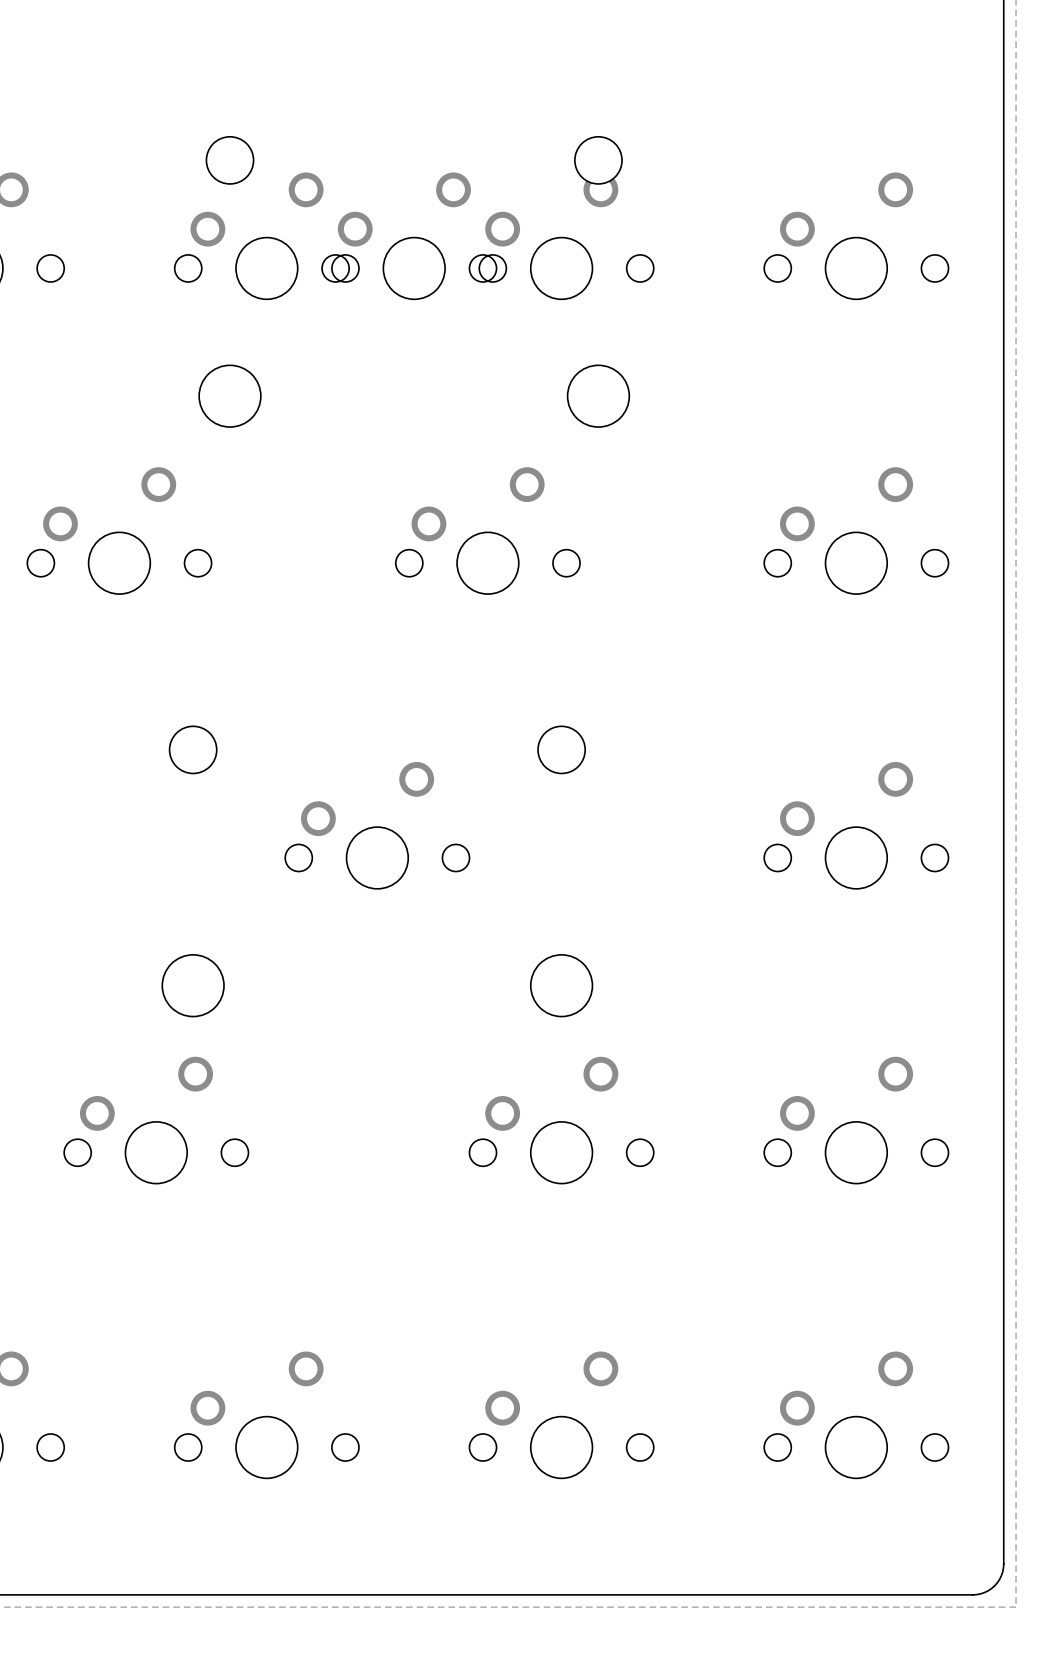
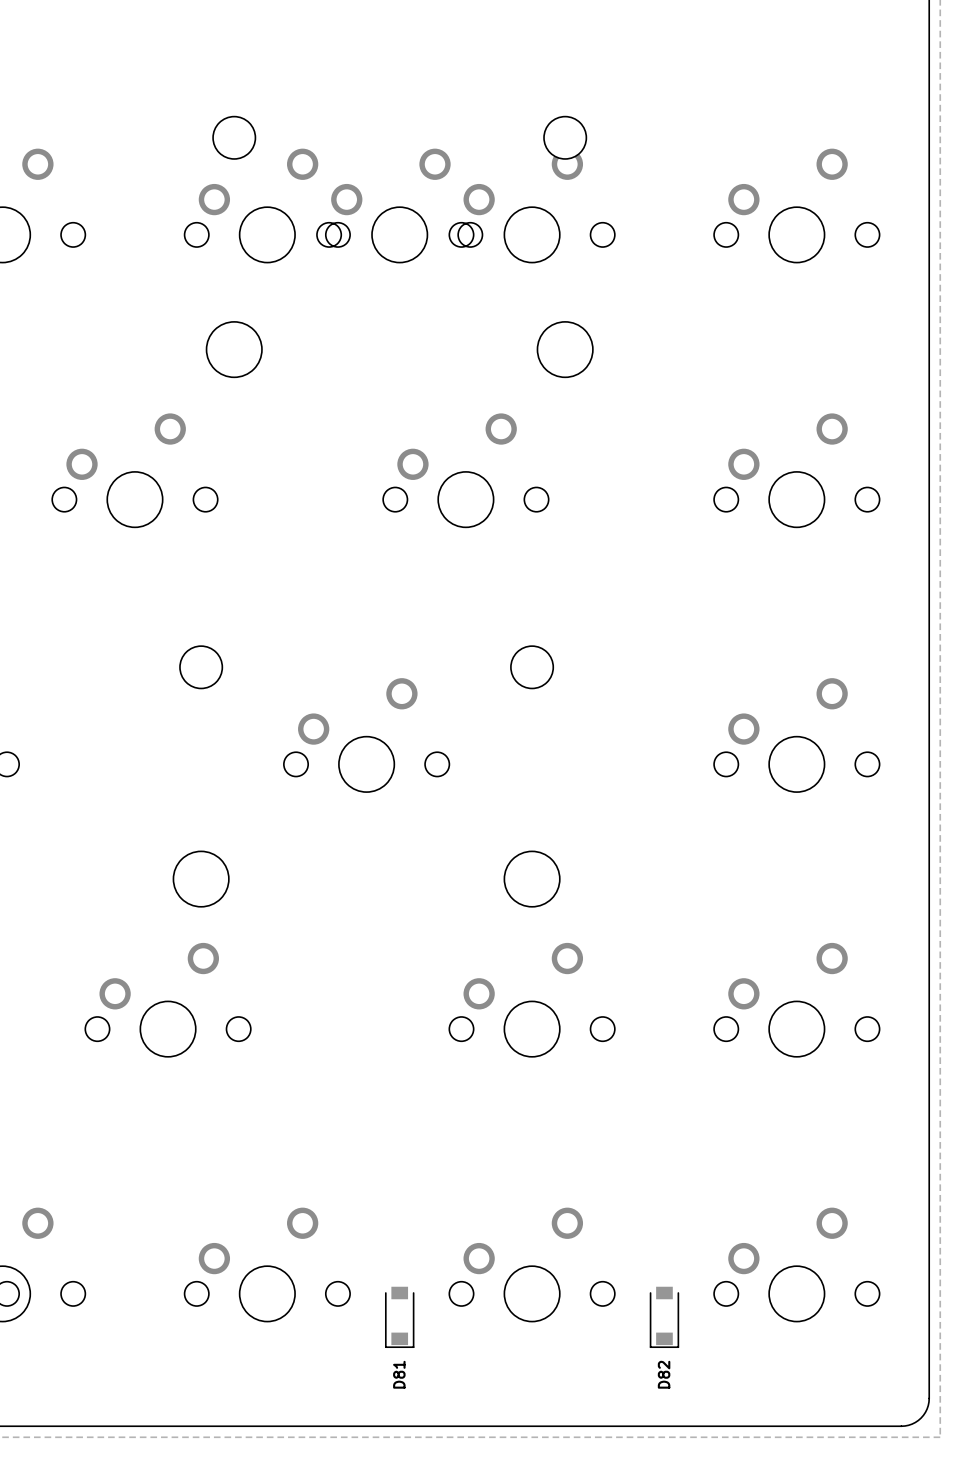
D81: none -> (399, 1317)
D82: none -> (664, 1317)

